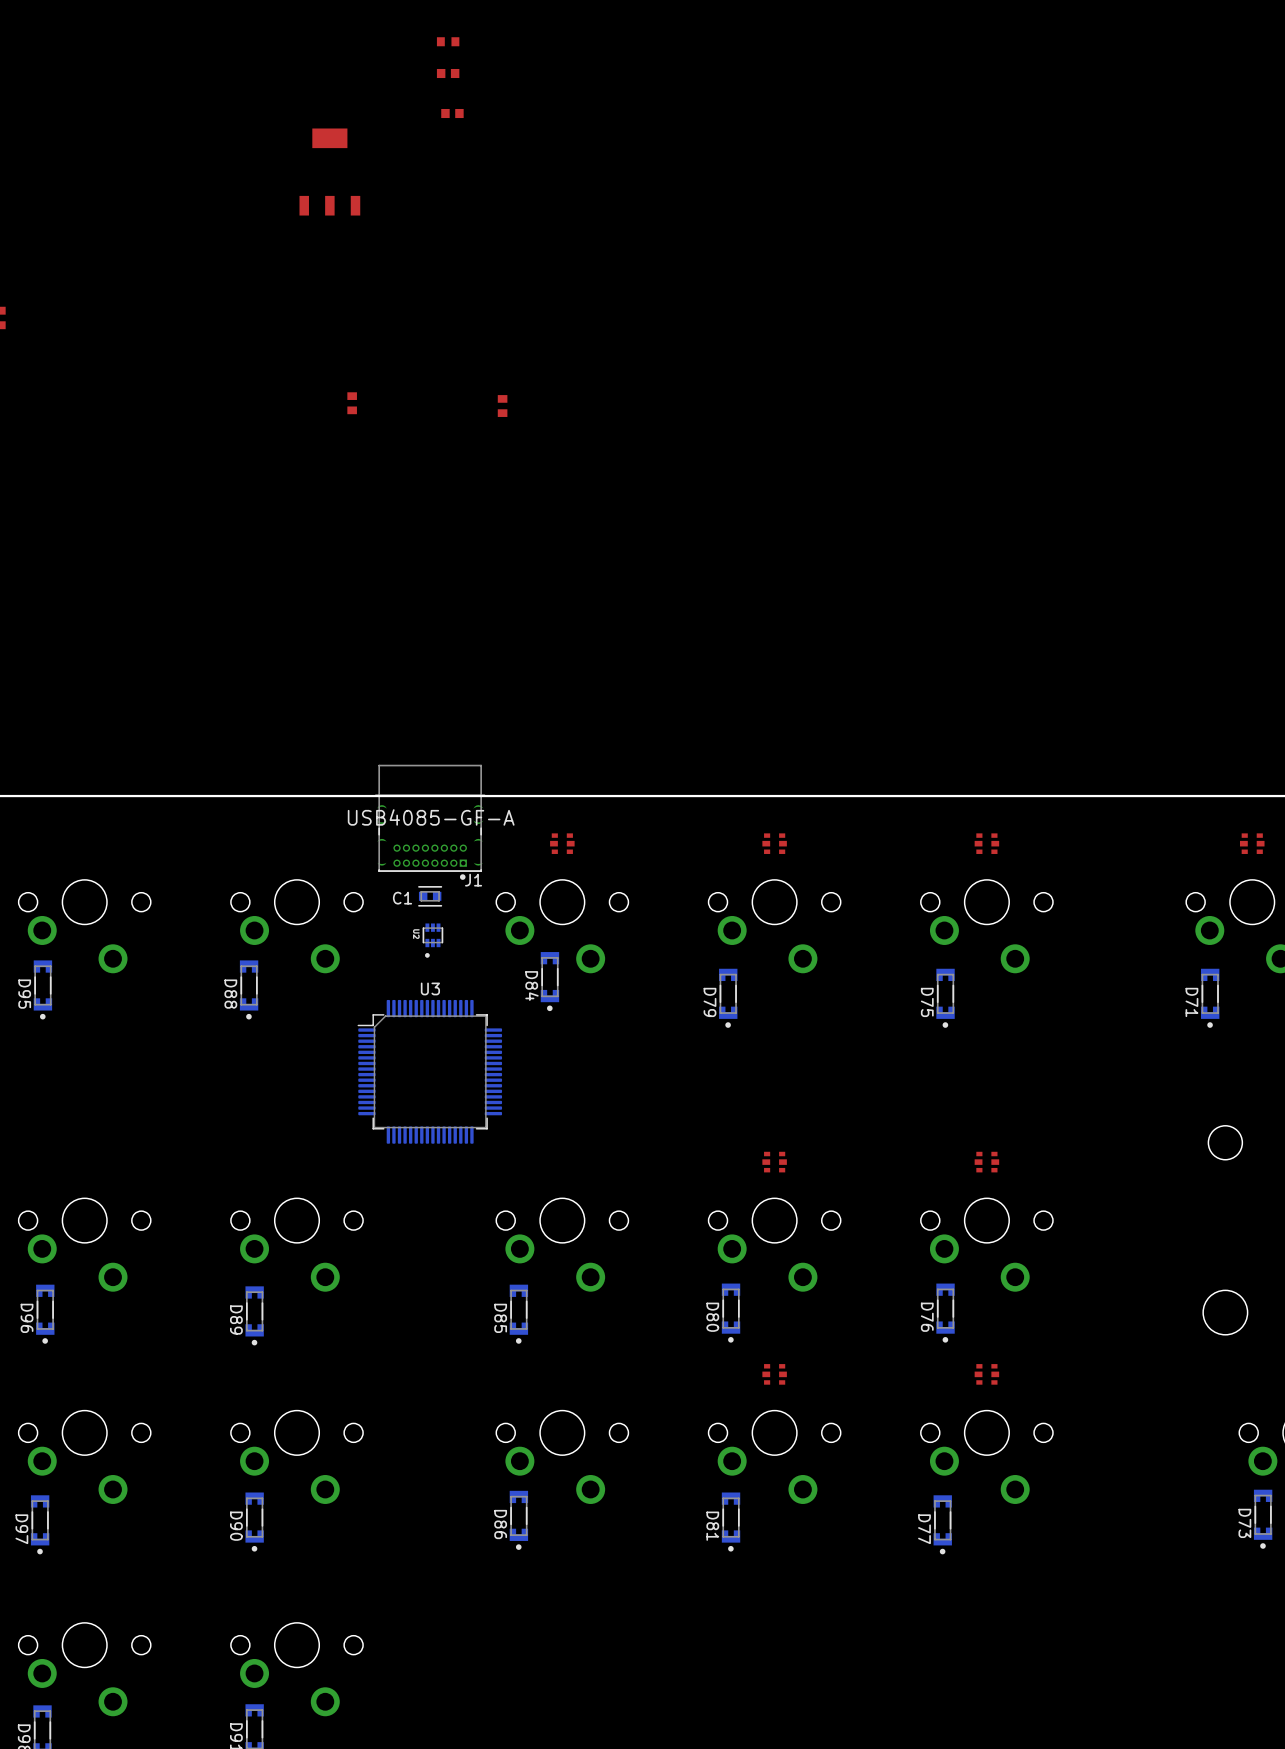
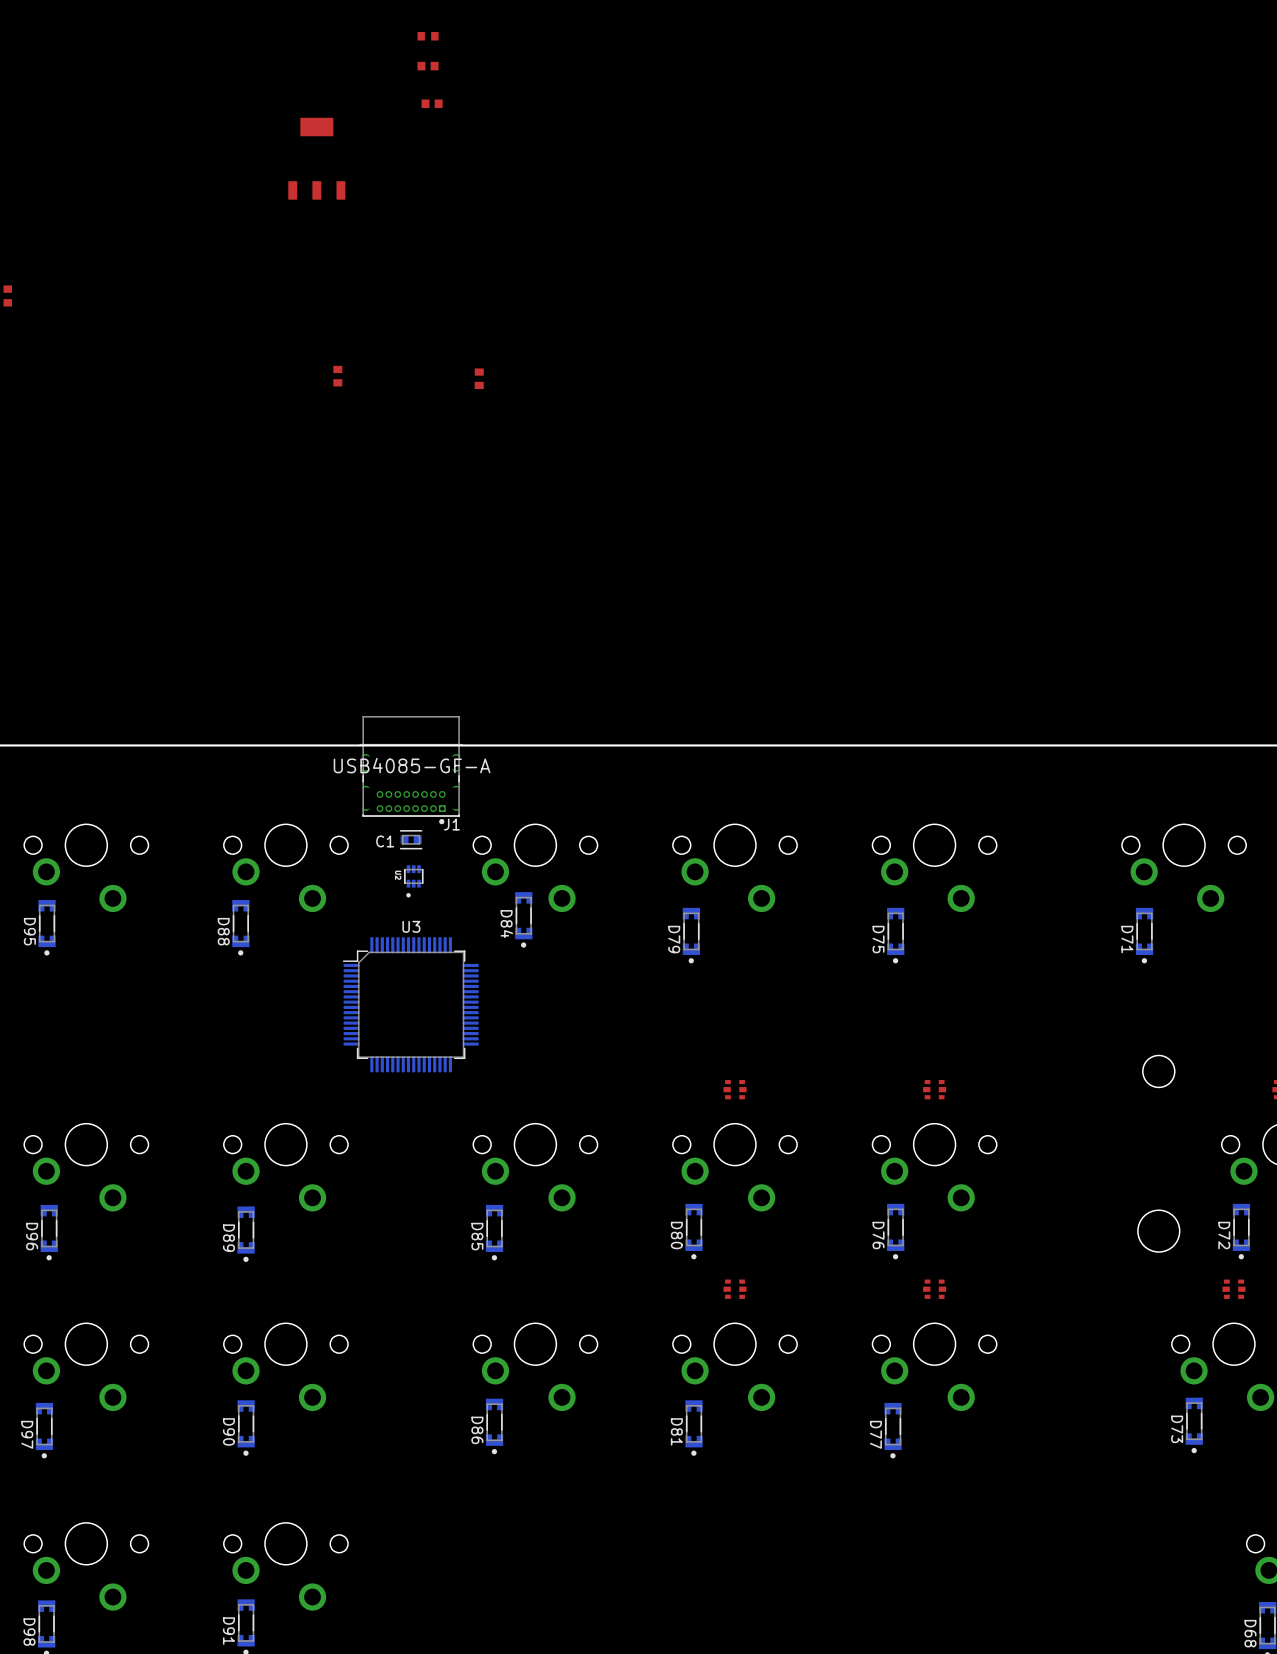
part: (562, 843) -> none
part: (774, 843) -> none
part: (986, 843) -> none
part: (1252, 843) -> none

